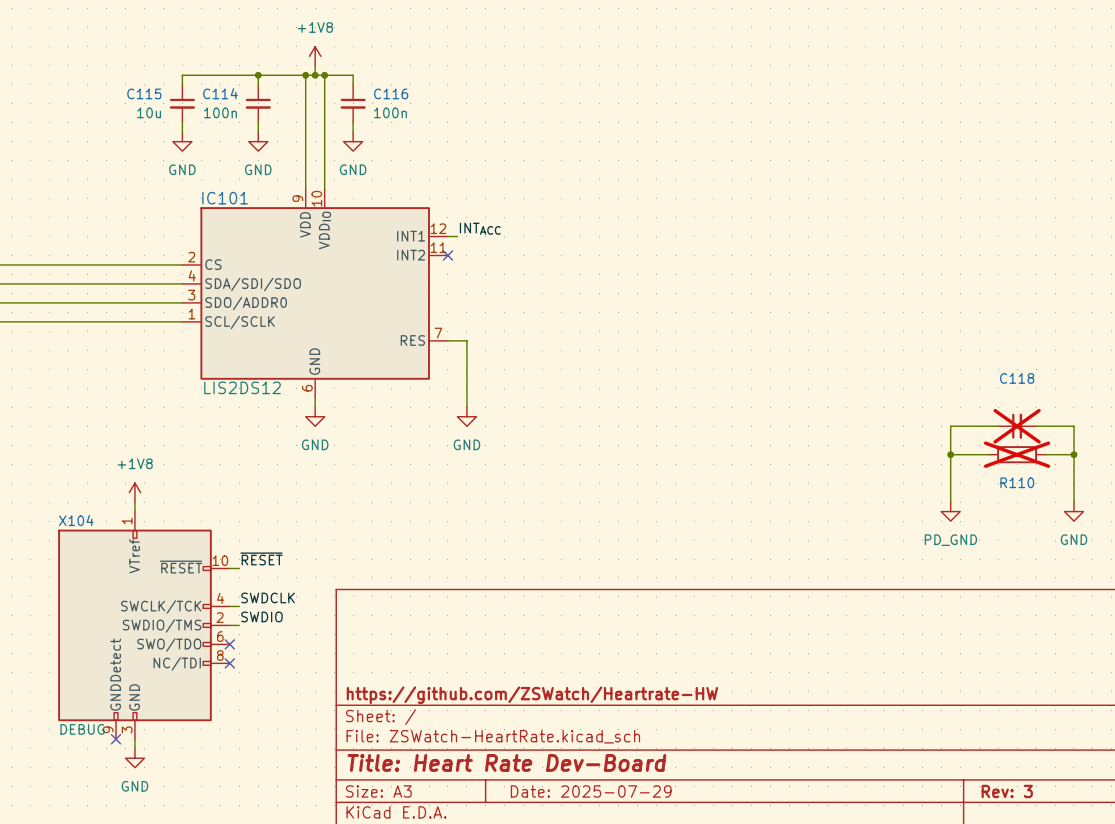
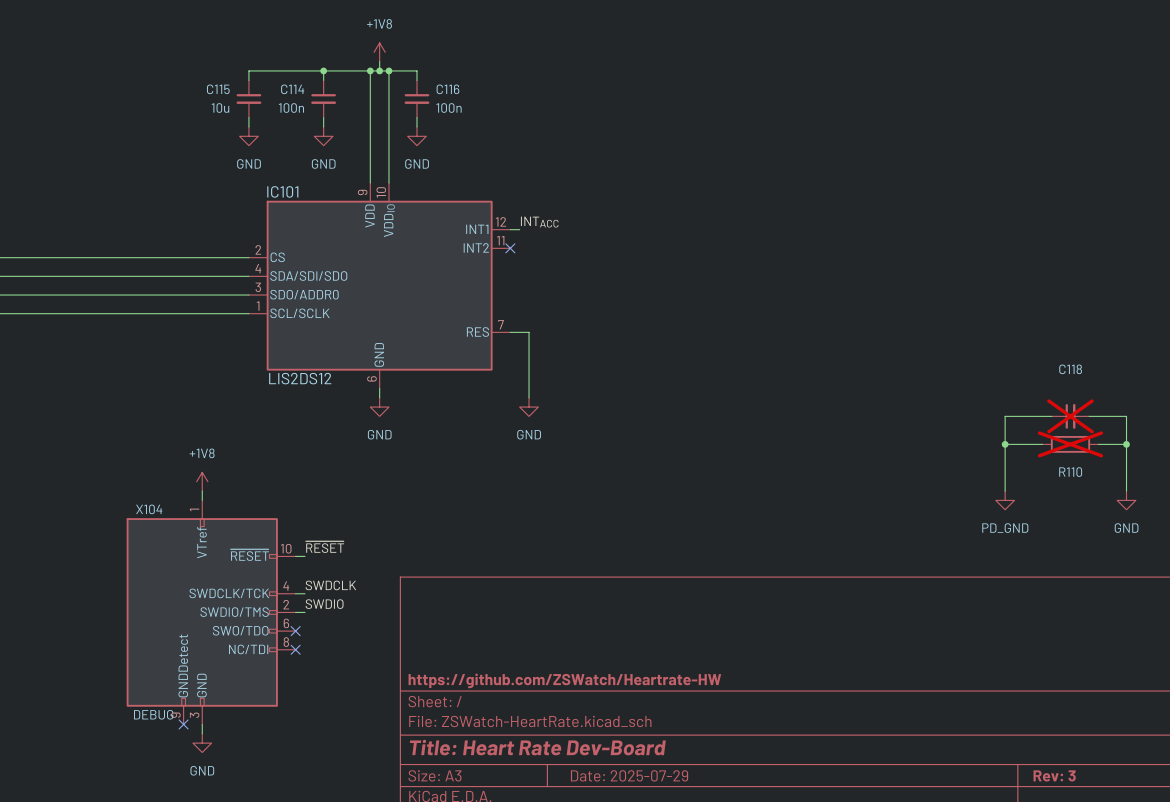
X104 pin name: SWCLK/TCK (161, 607) -> SWDCLK/TCK (229, 593)

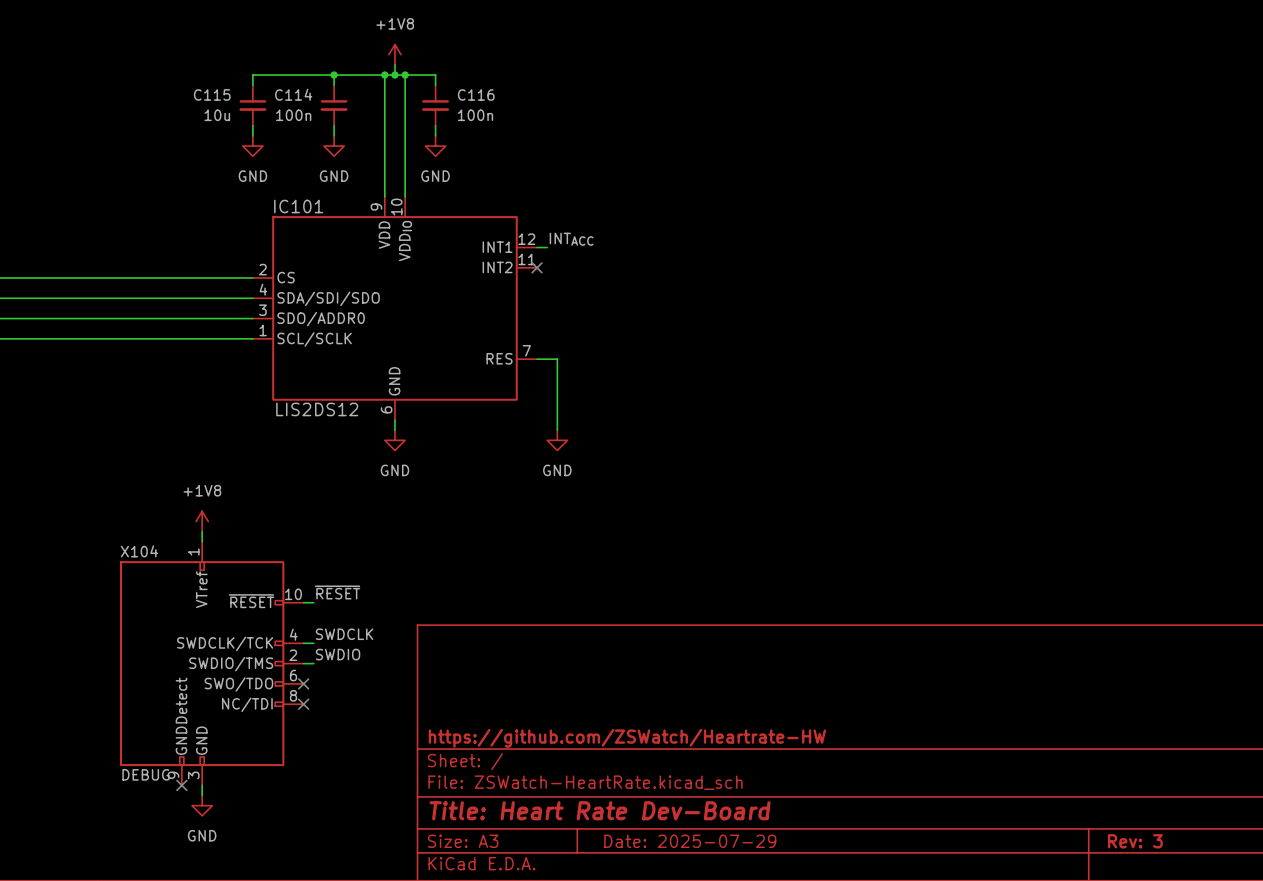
wire: (1051, 416) (1005, 416) (1005, 491) -> none
C118: (1070, 416) -> none
wire: (1089, 416) (1126, 416) (1126, 491) -> none
wire: (1005, 444) (1042, 444) -> none
junction: (1005, 444) -> none
R110: (1070, 444) -> none
wire: (1098, 444) (1126, 444) -> none
junction: (1126, 444) -> none
power symbol: PD_GND (1005, 500) -> none
power symbol: GND (1126, 500) -> none

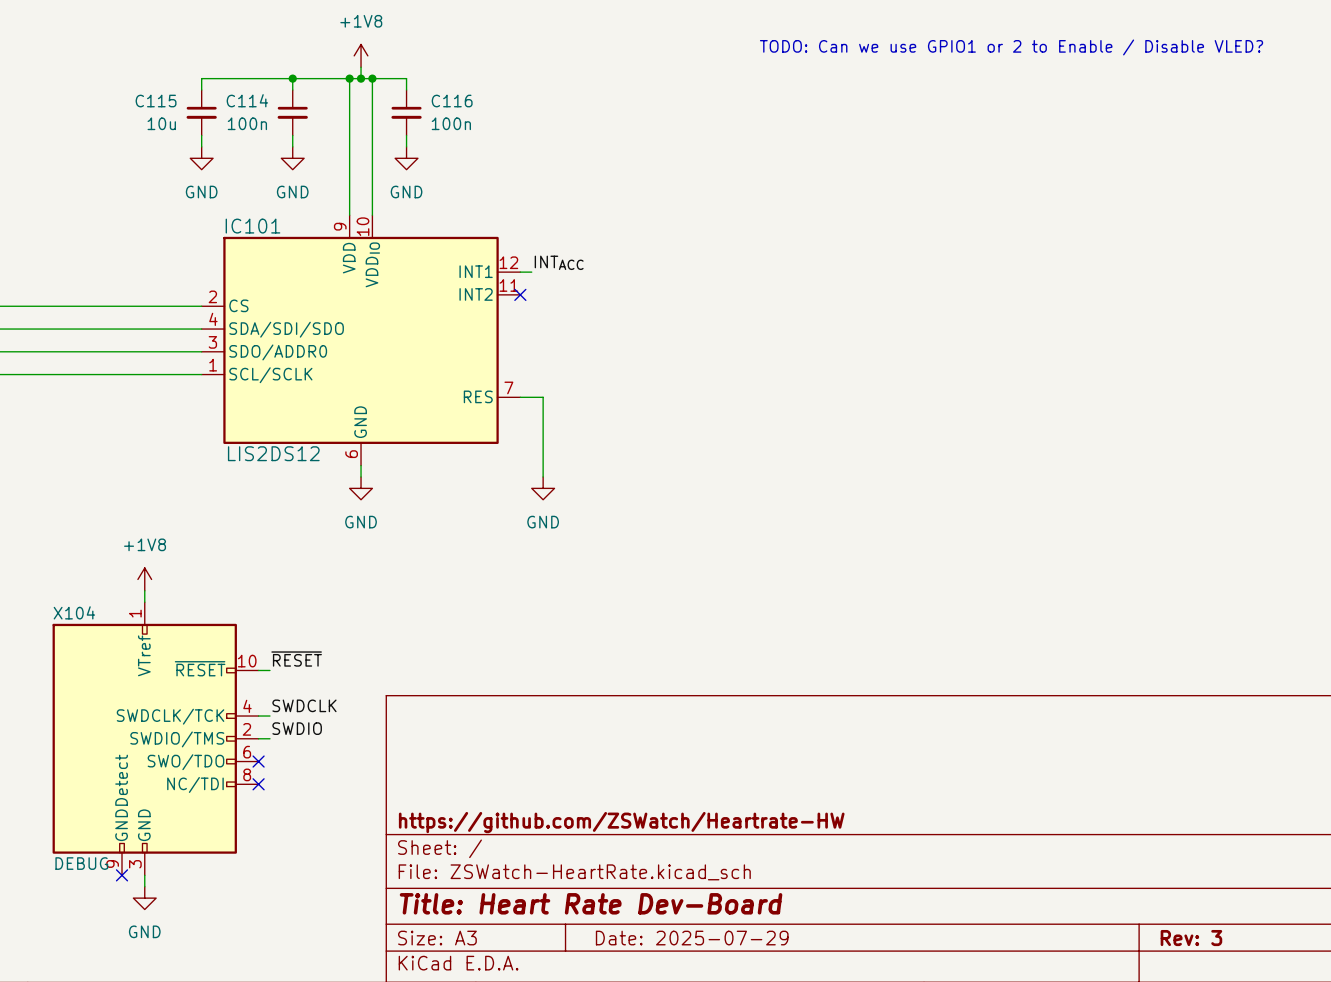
text: none -> TODO: Can we use GPIO1 or 2 to Enable / Disable VLED? (1011, 47)

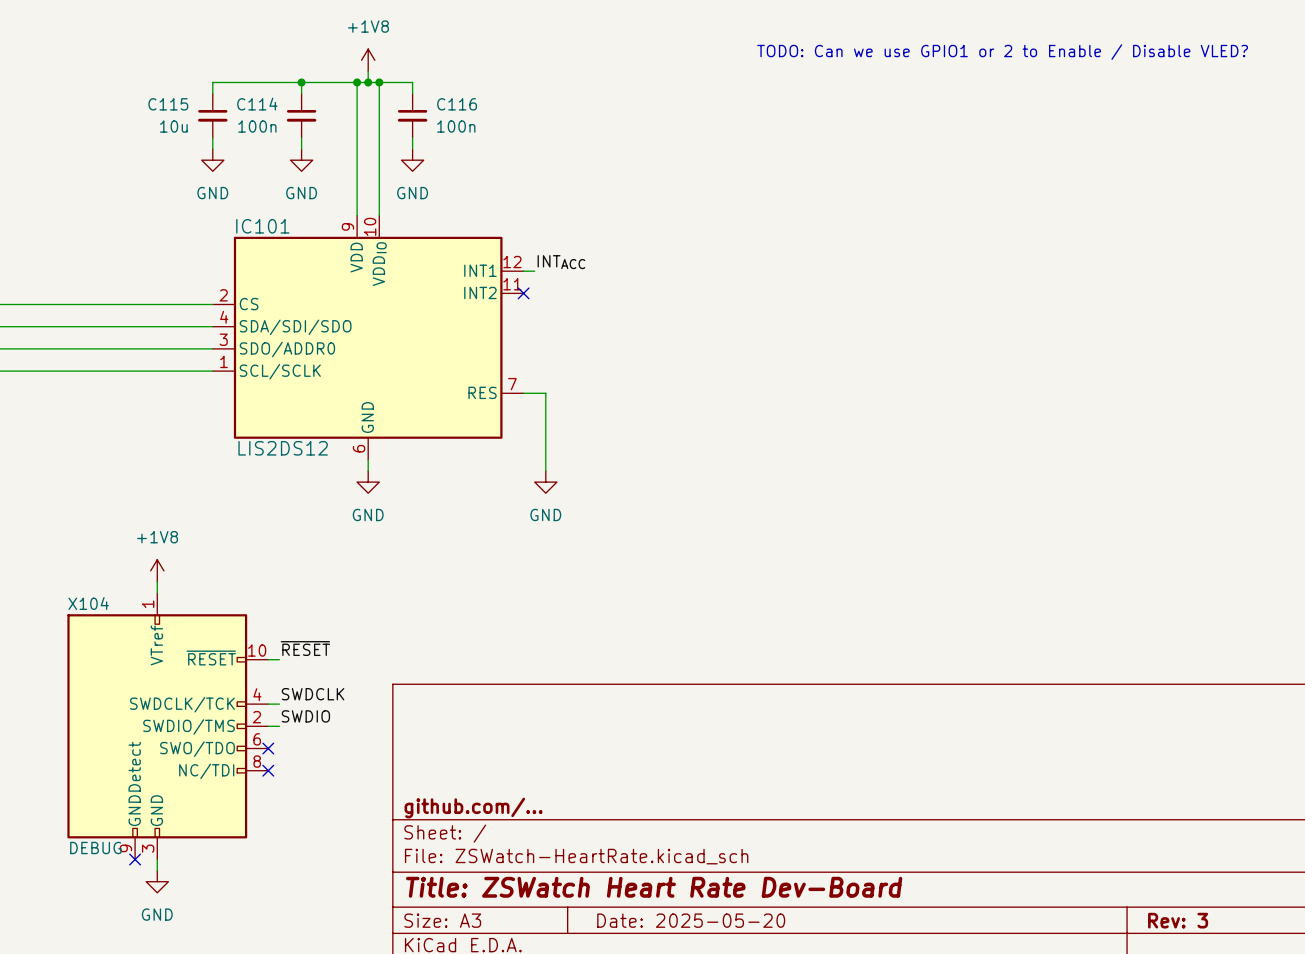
title block: https://github.com/ZSWatch/Heartrate-HW (621, 822) -> github.com/... (473, 808)
title block: Title: Heart Rate Dev-Board (591, 903) -> Title: ZSWatch Heart Rate Dev-Board (654, 887)
title block: Date: 2025-07-29 (692, 938) -> Date: 2025-05-20 (691, 920)

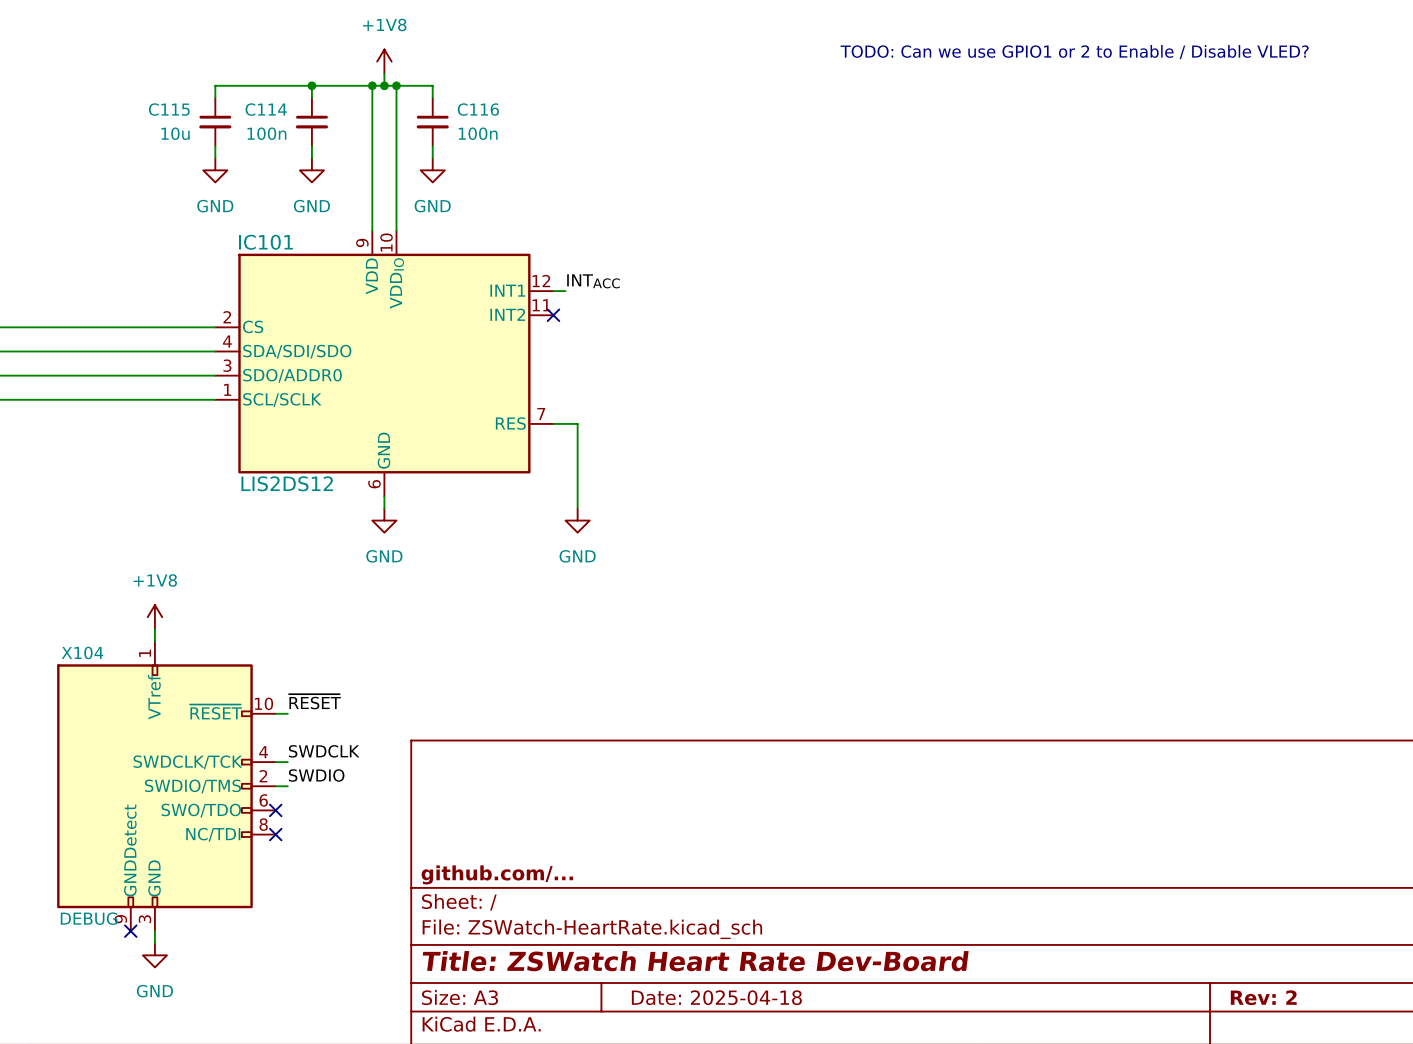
title block: Date: 2025-05-20 (691, 920) -> Date: 2025-04-18 (716, 997)
title block: Rev: 3 (1178, 920) -> Rev: 2 (1263, 997)

